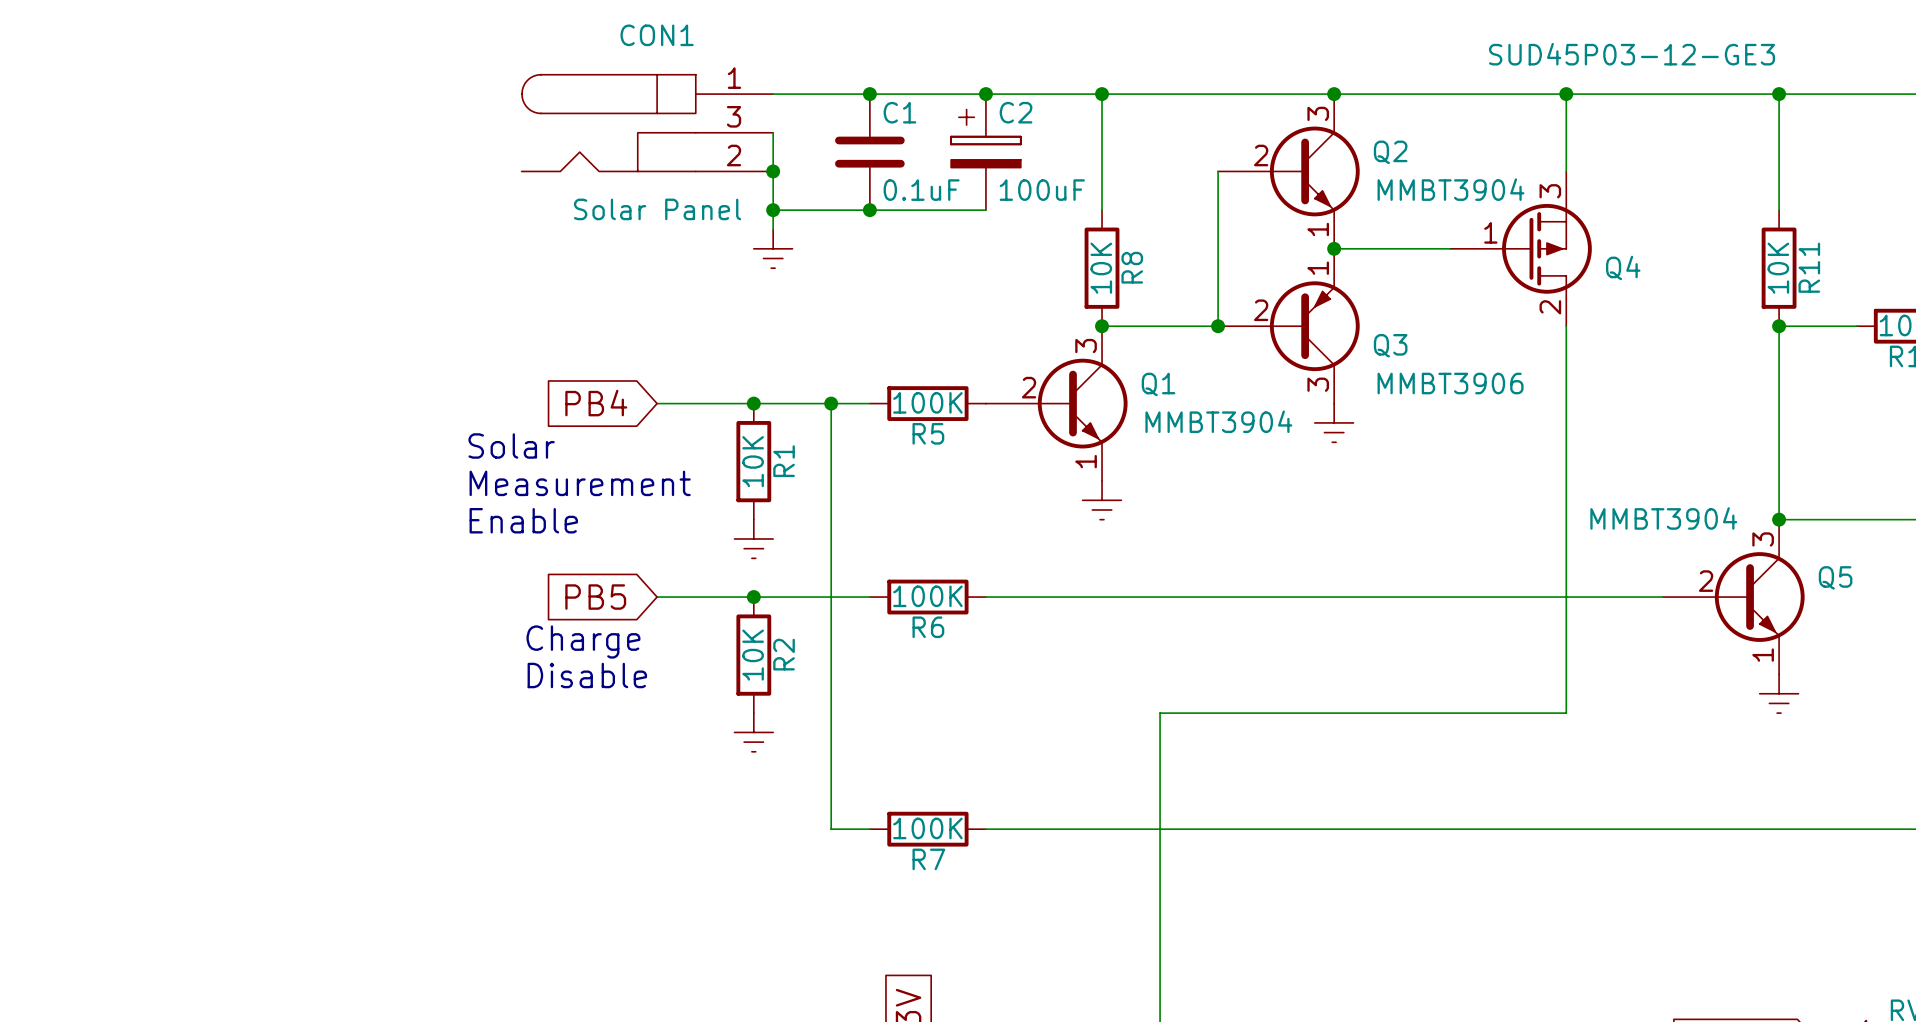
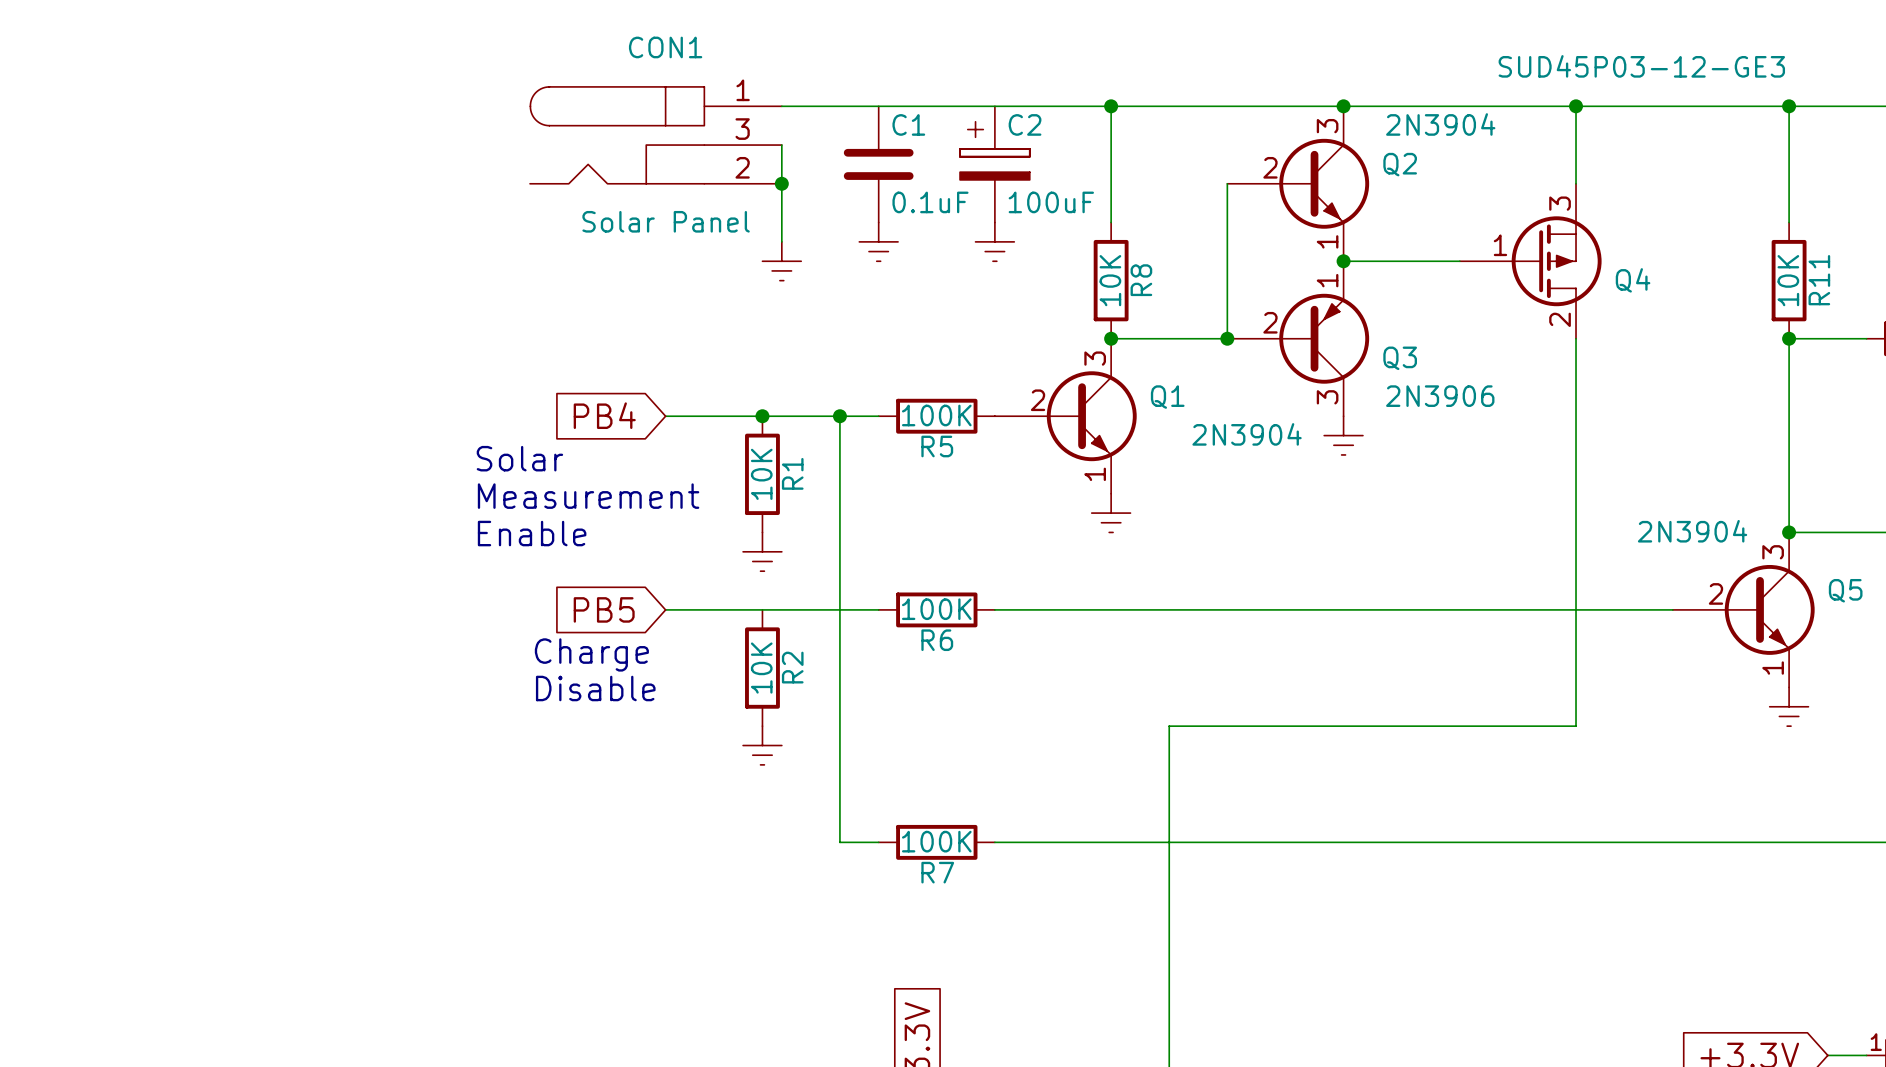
junction: (869, 94) -> none
junction: (985, 94) -> none
Q2 value: MMBT3904 (1450, 189) -> 2N3904 (1440, 124)
wire: (773, 210) (985, 210) -> none
junction: (773, 210) -> none
junction: (869, 210) -> none
power symbol: none -> (878, 241)
power symbol: none -> (994, 241)
Q3 value: MMBT3906 (1450, 383) -> 2N3906 (1440, 396)
Q1 value: MMBT3904 (1218, 421) -> 2N3904 (1247, 434)
Q5 value: MMBT3904 (1663, 518) -> 2N3904 (1692, 531)
junction: (753, 597) -> none

